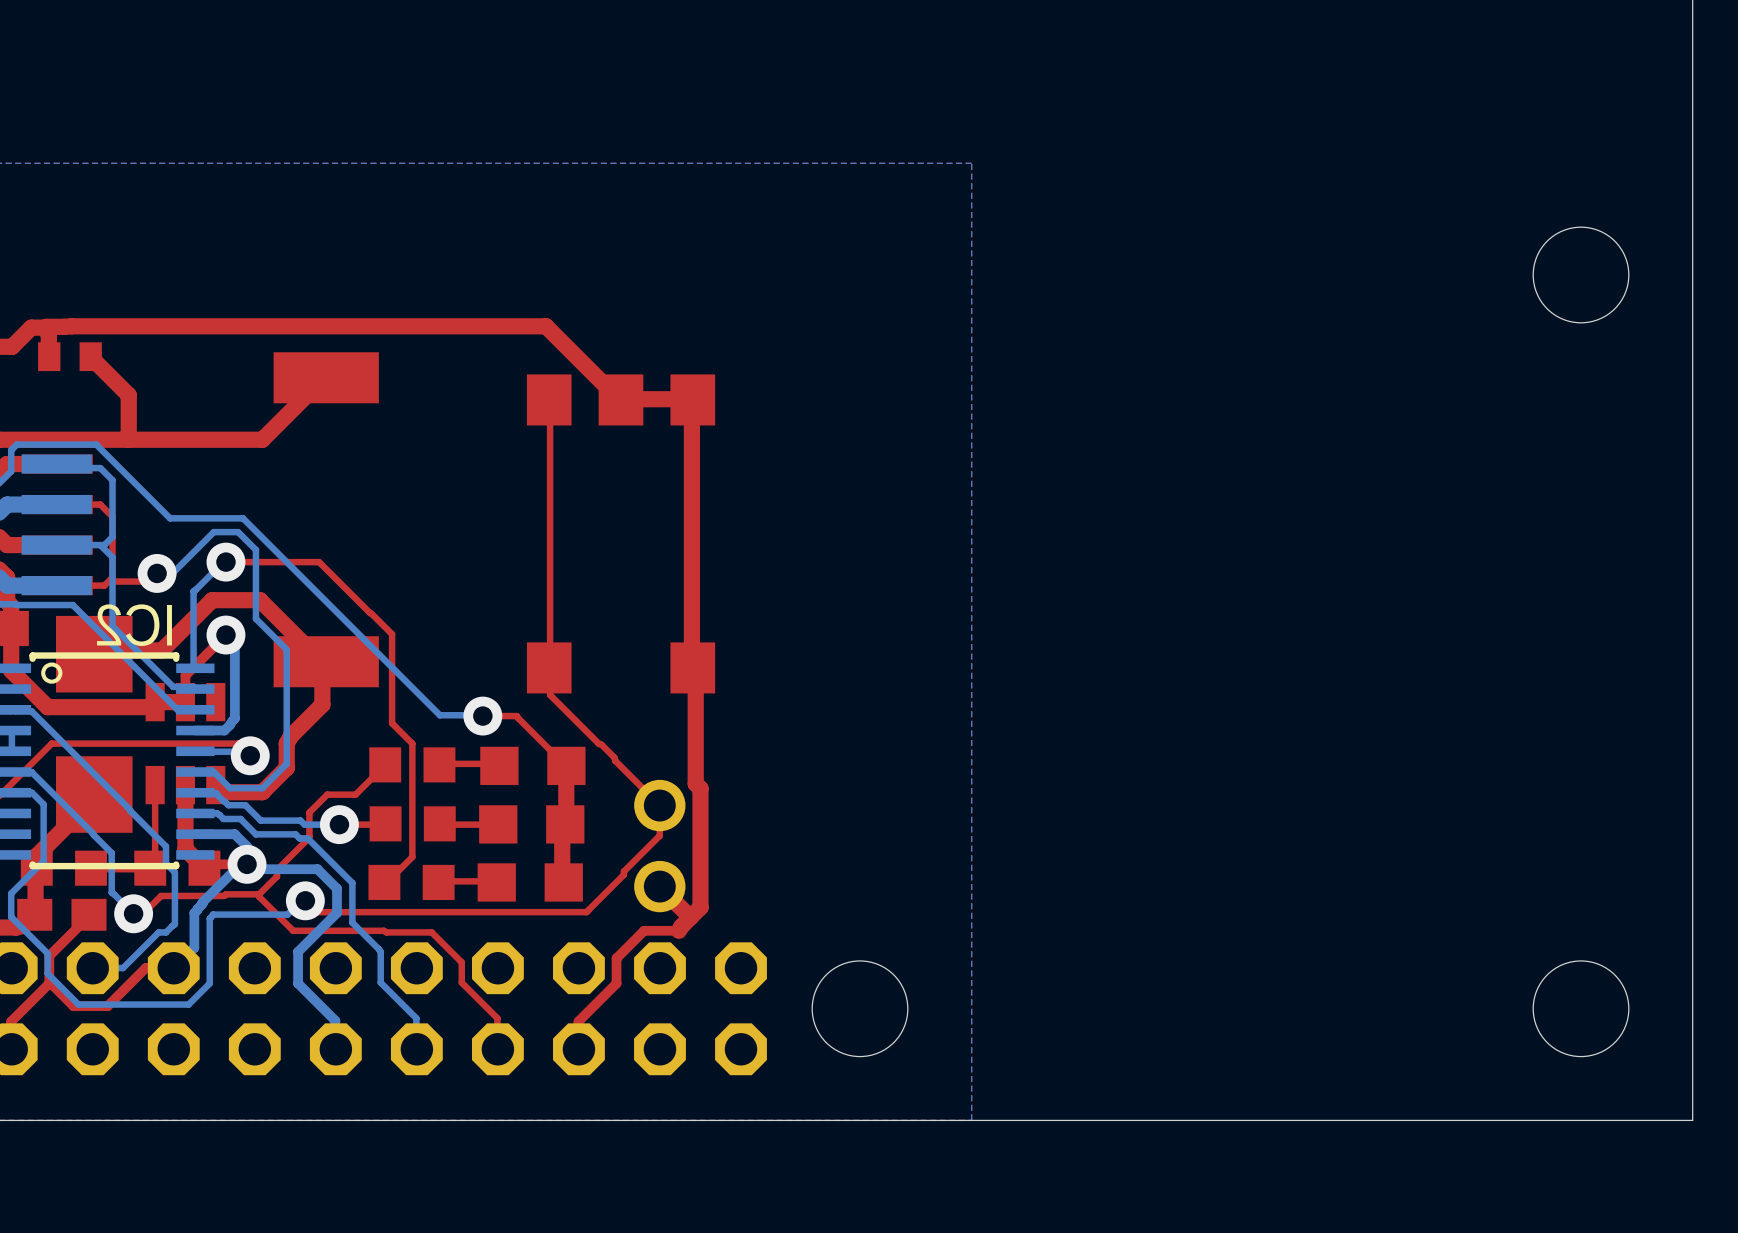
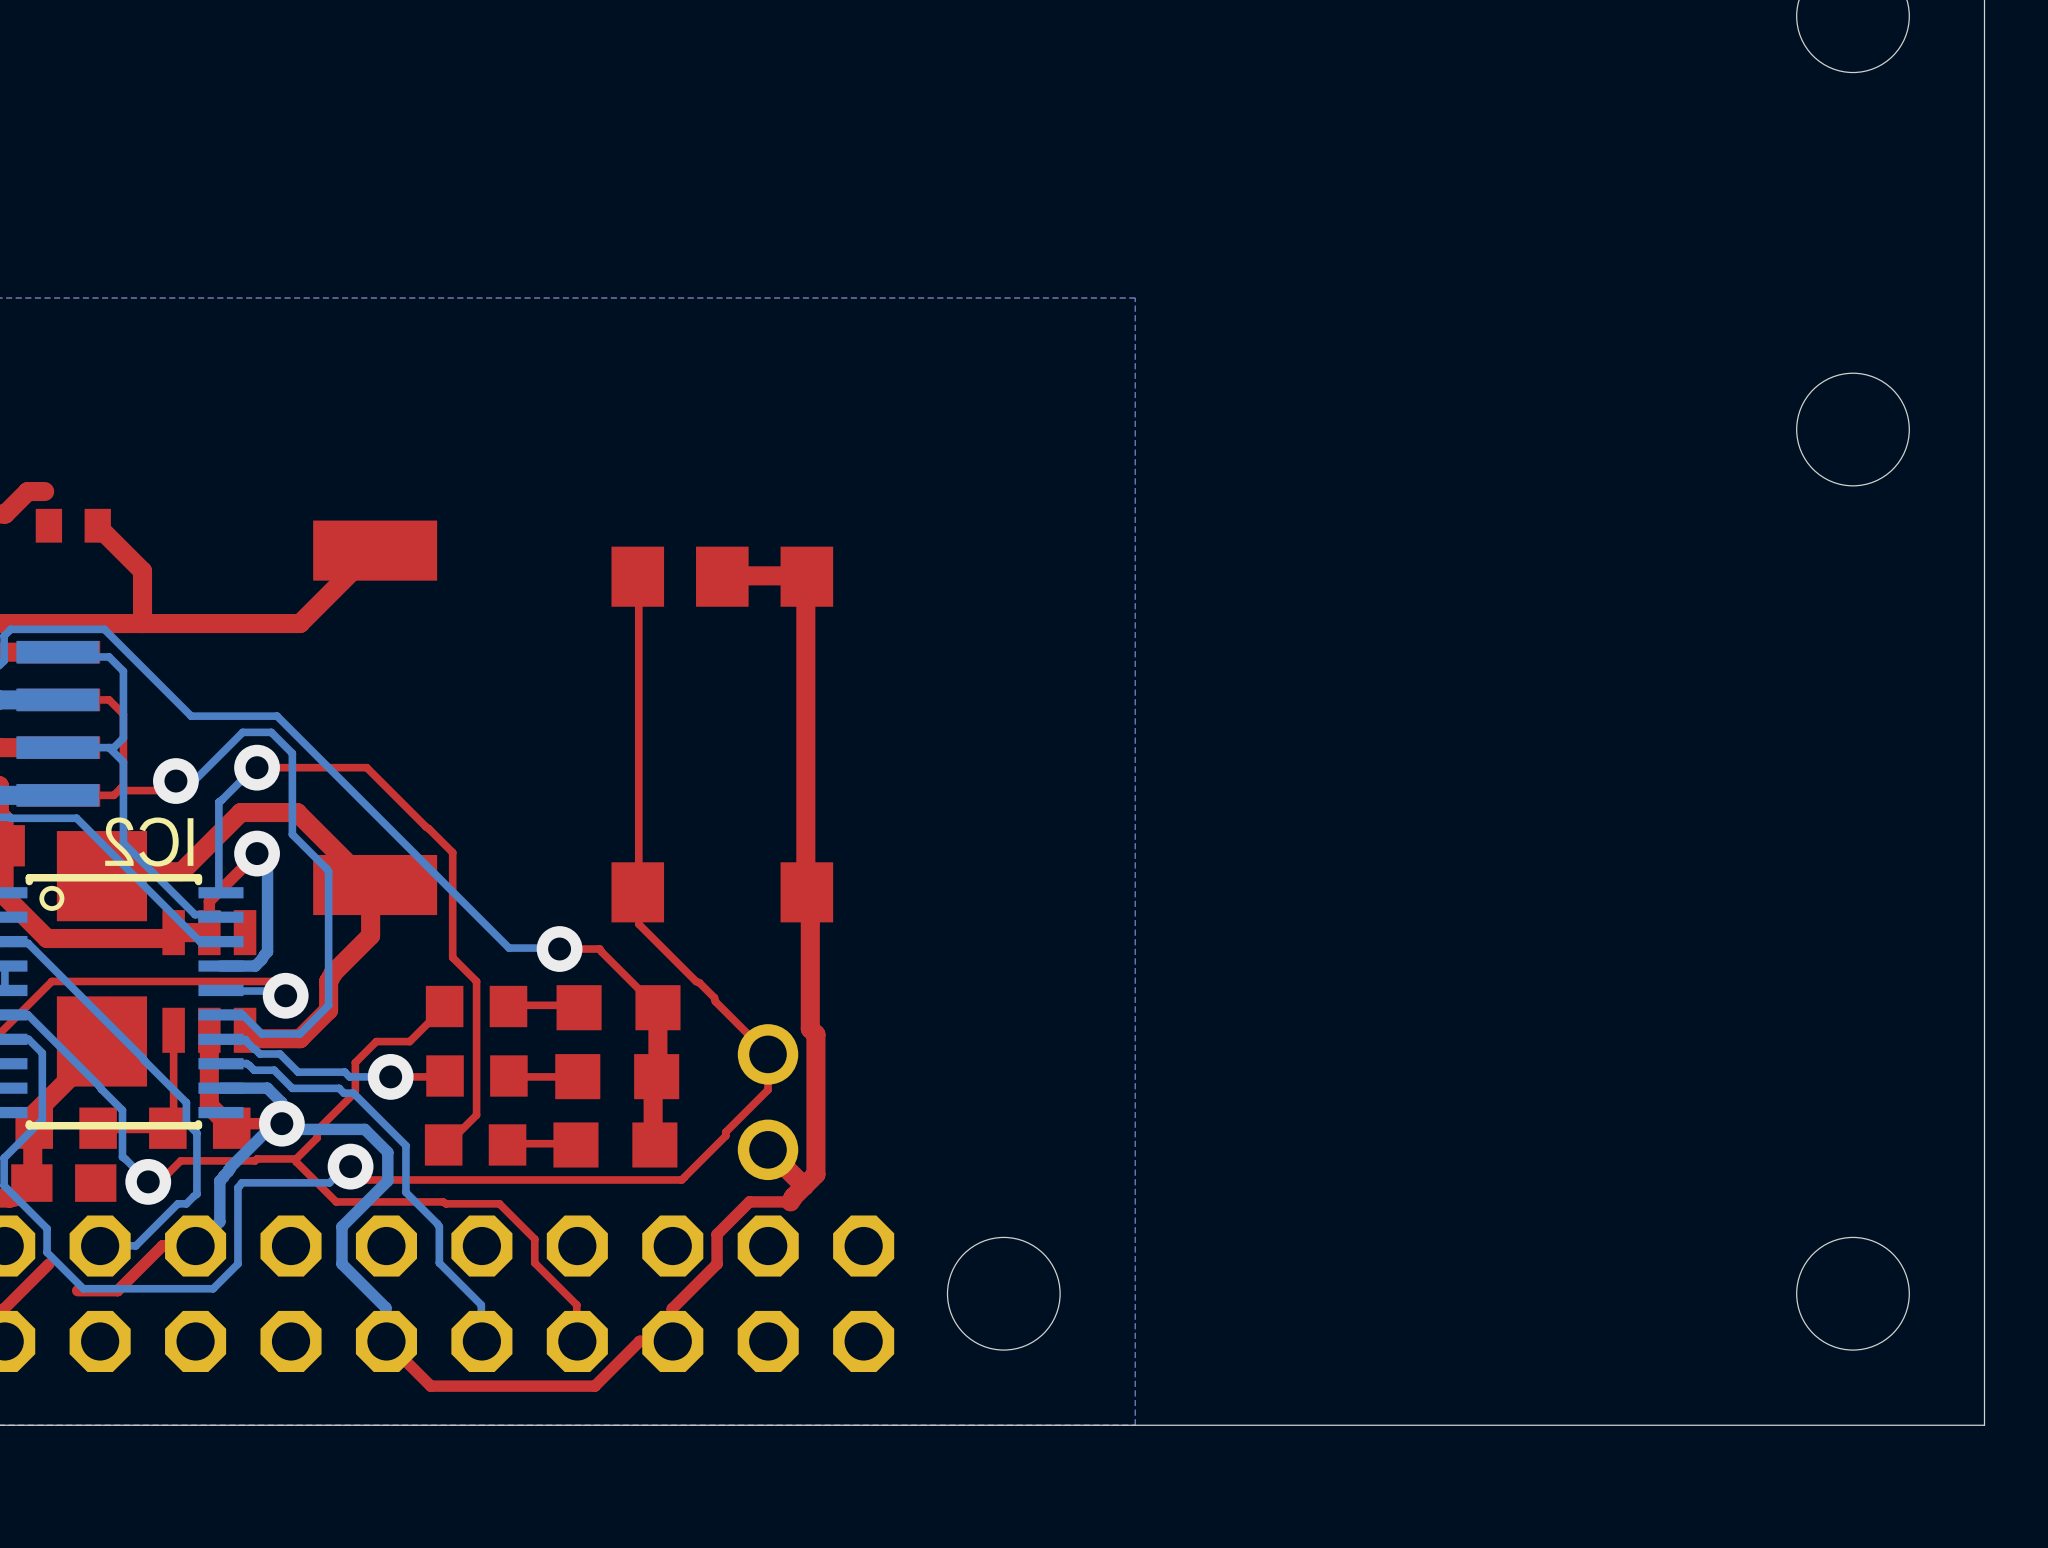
top track: (47, 358) (48, 335) (46, 326) (546, 326) (621, 399) -> none
top track: (85, 917) (88, 914) (49, 955) (49, 983) (73, 1006) -> none
top track: none -> (672, 1341) (639, 1341) (594, 1386) (430, 1386) (386, 1341)

